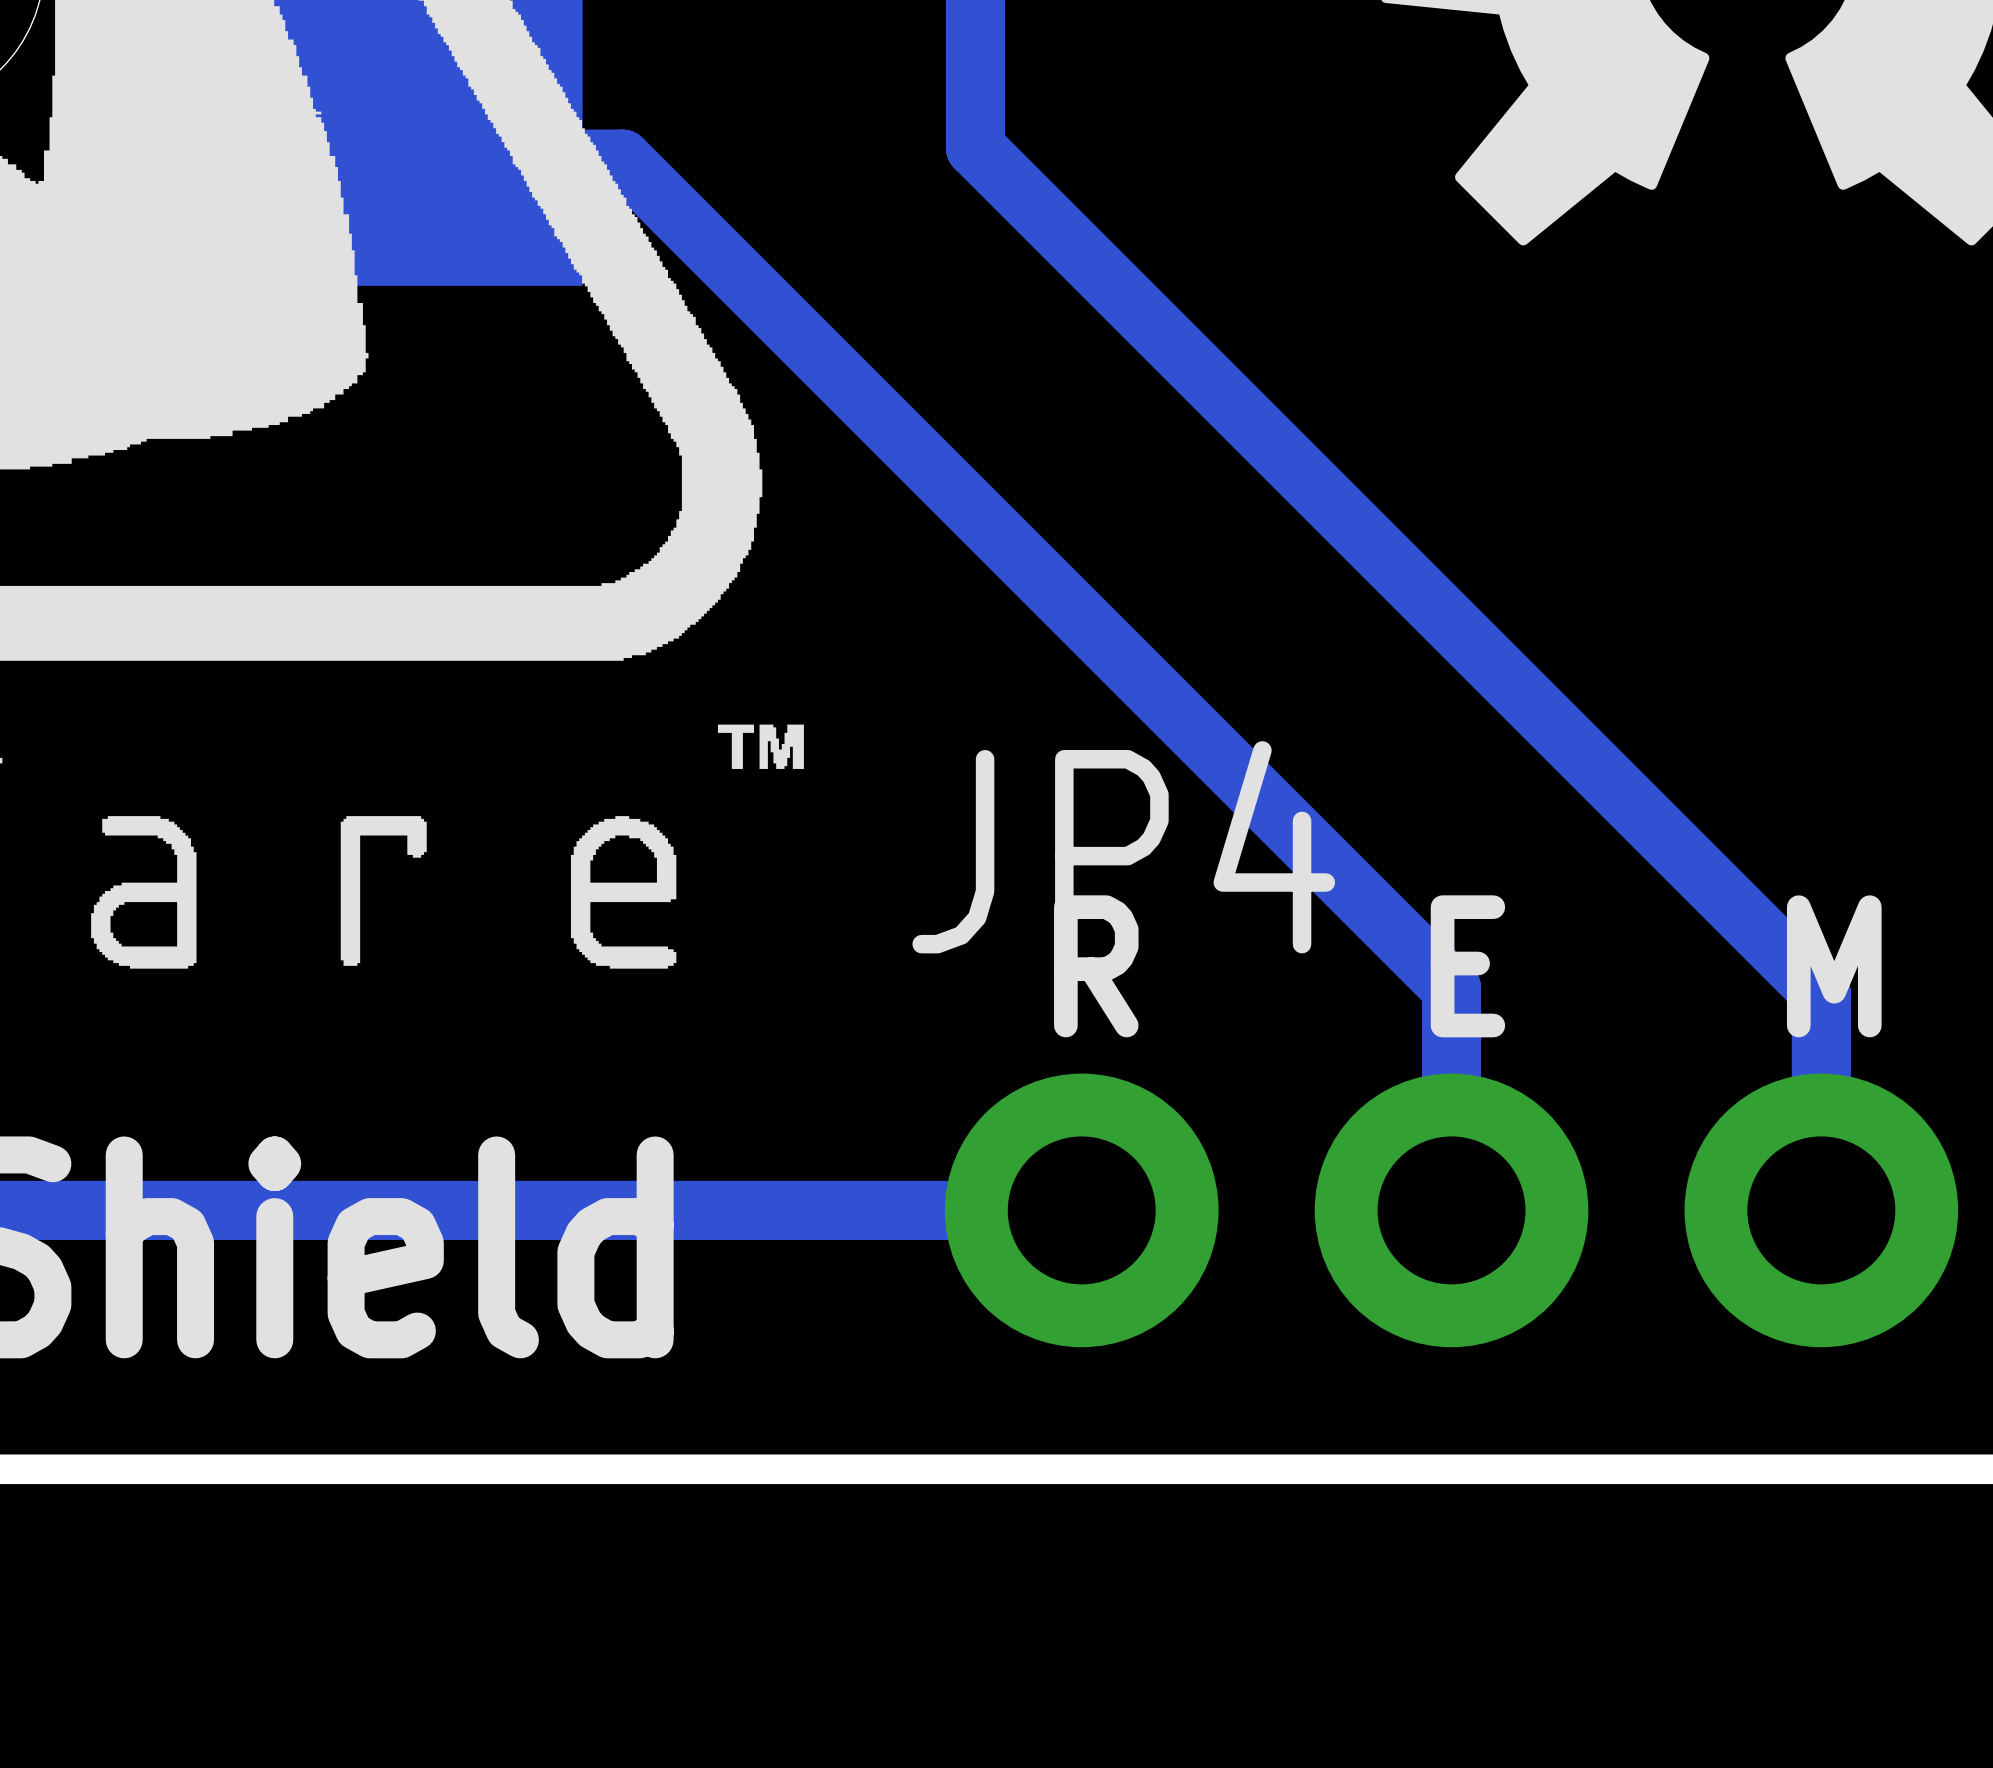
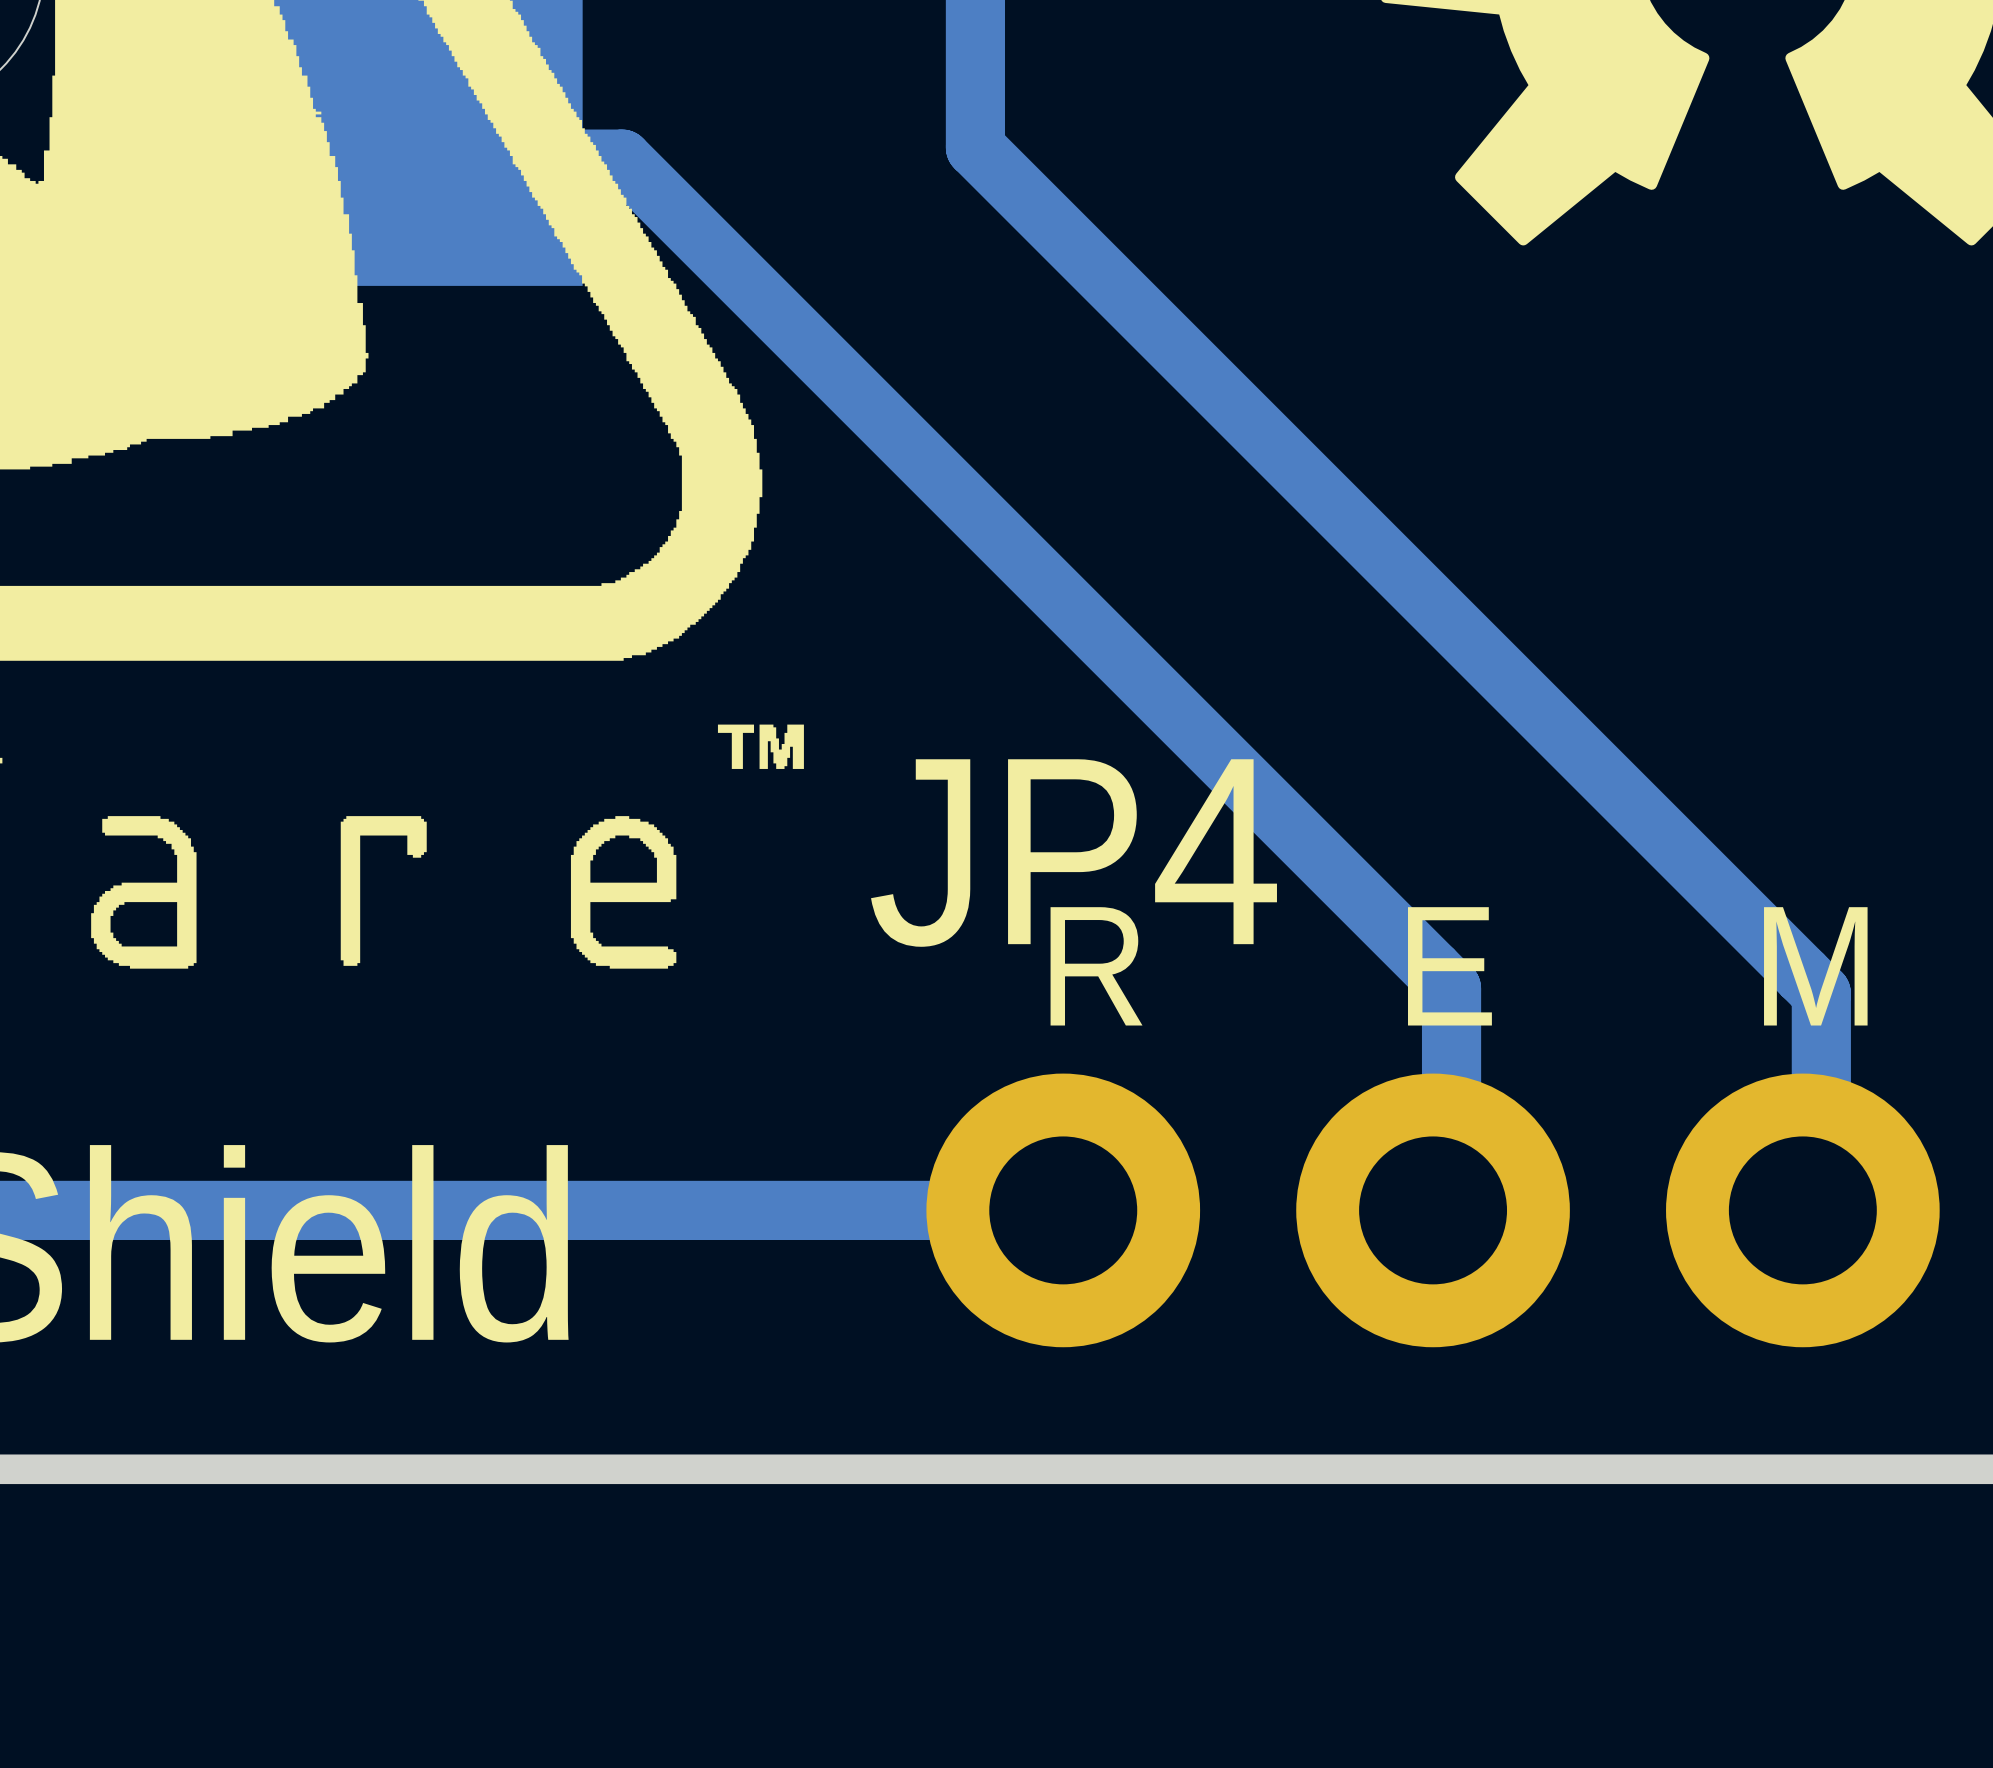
text position: E (1467, 966) -> E (1449, 966)
text position: M (1834, 966) -> M (1815, 966)
JP4 position: (1451, 1210) -> (1433, 1210)

